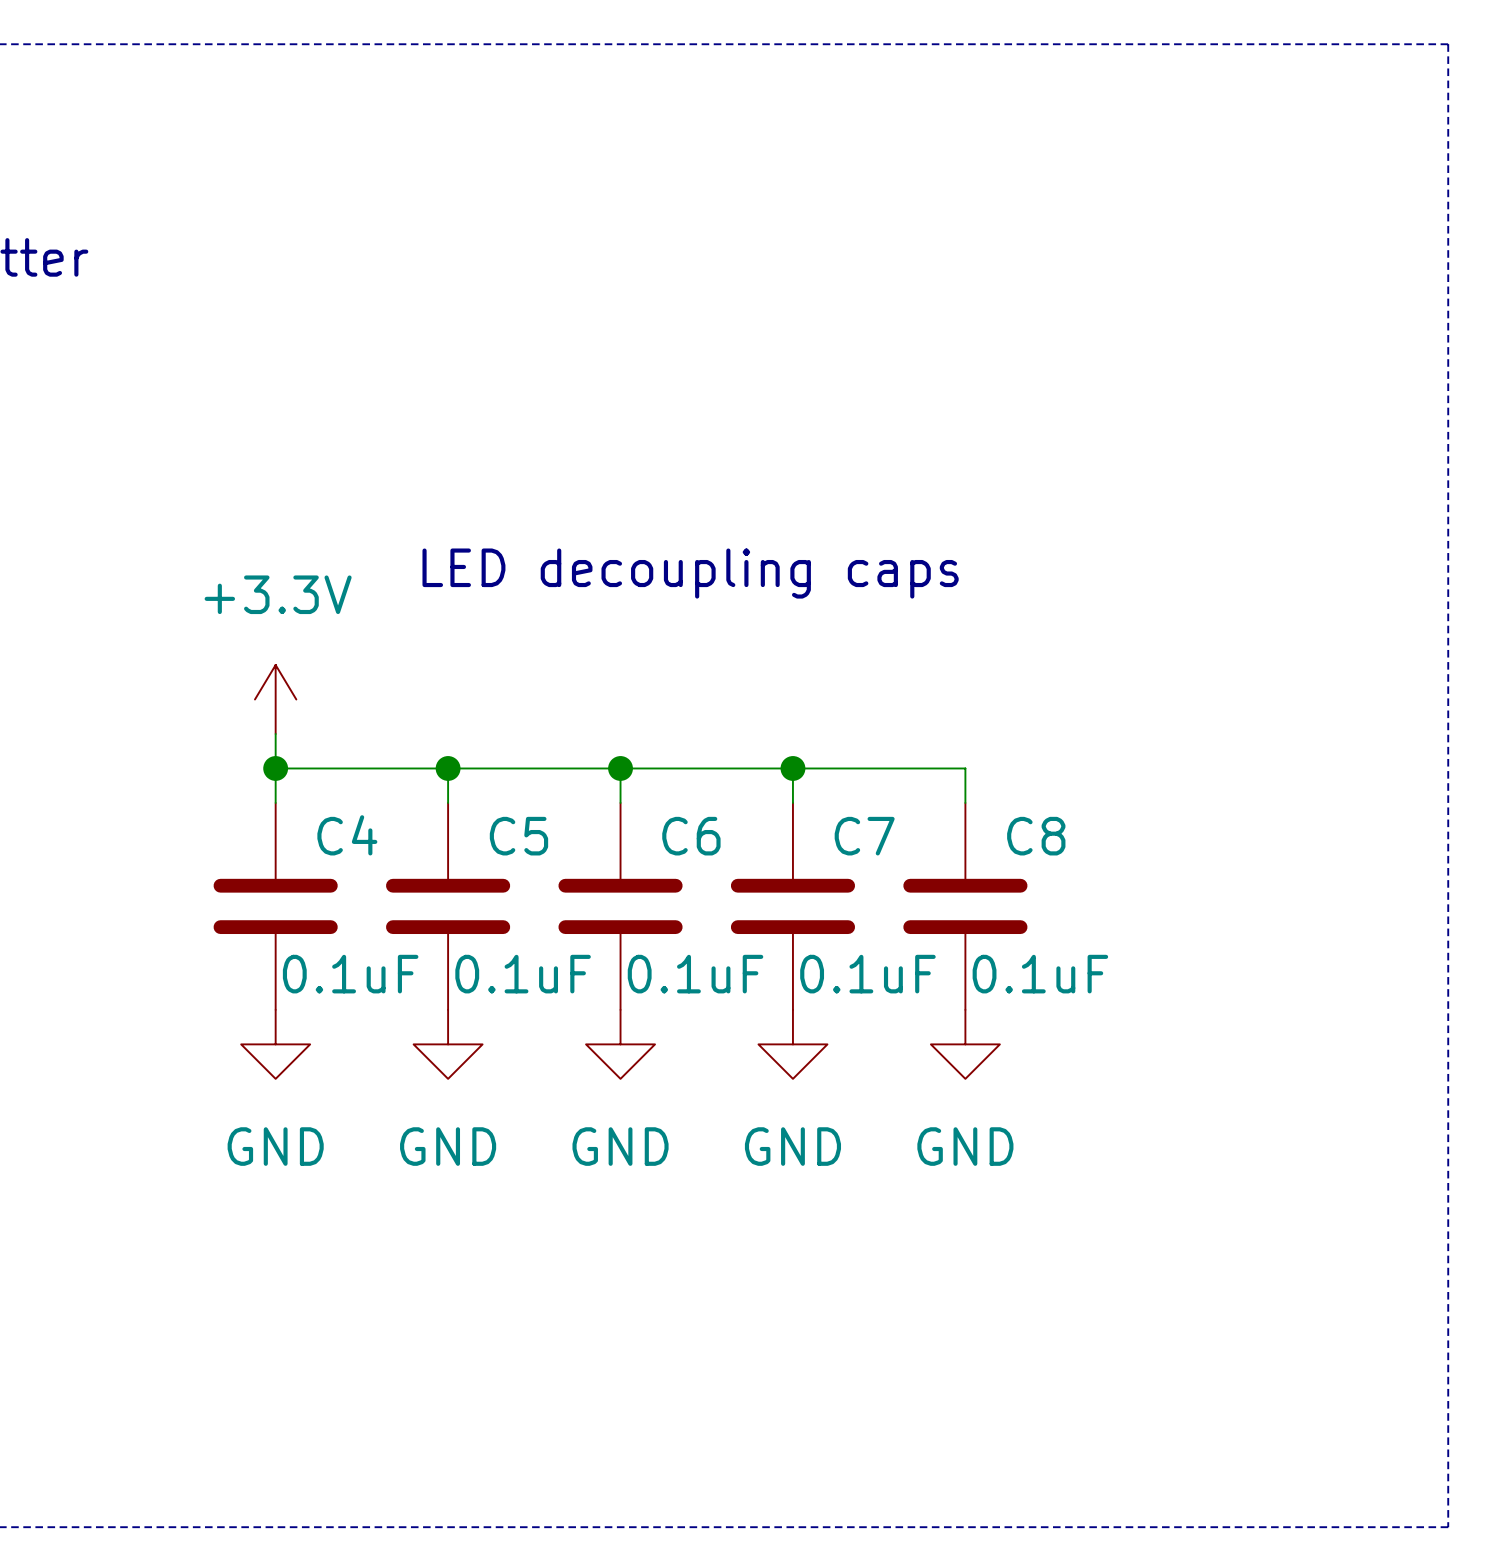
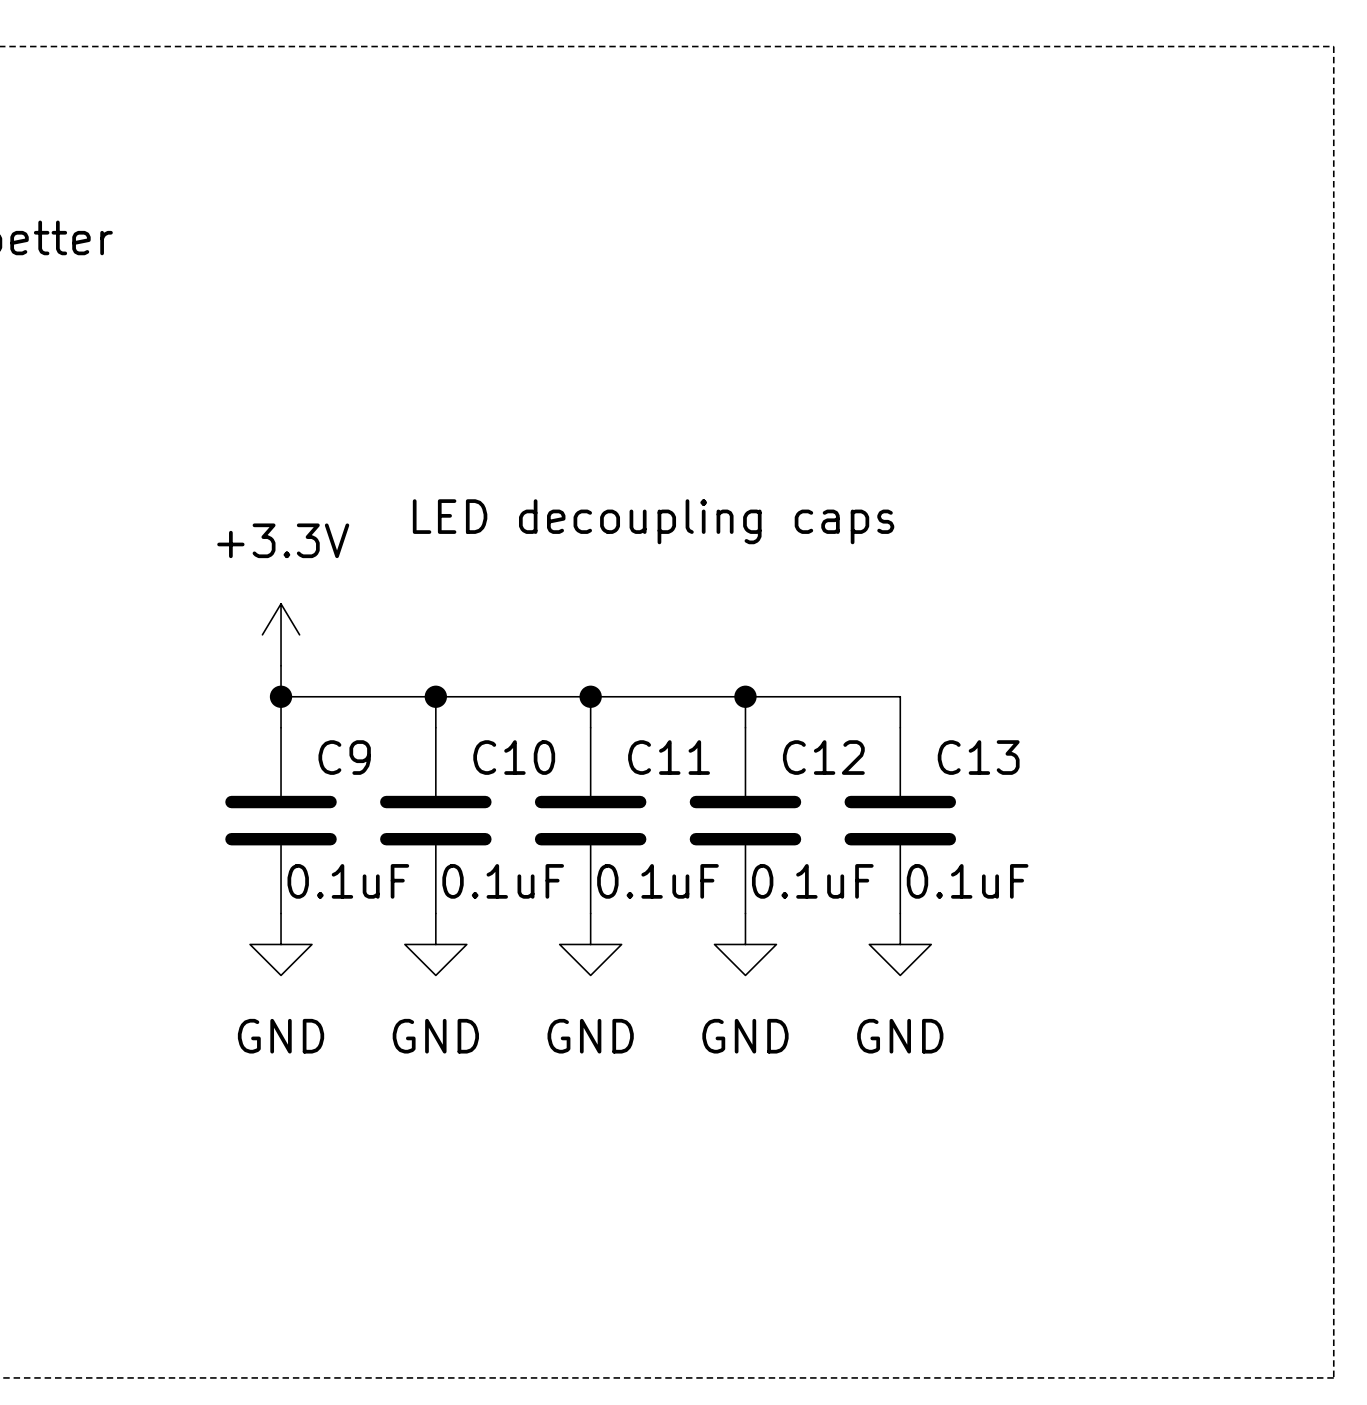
C4 name: C4 (347, 835) -> C9 (344, 757)
C5 name: C5 (518, 836) -> C10 (514, 757)
C6 name: C6 (691, 836) -> C11 (669, 757)
C7 name: C7 (864, 836) -> C12 (823, 757)
C8 name: C8 (1036, 836) -> C13 (978, 757)

